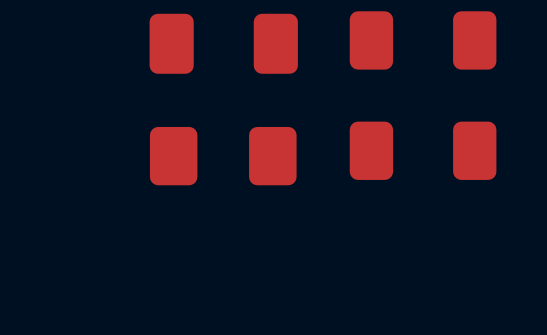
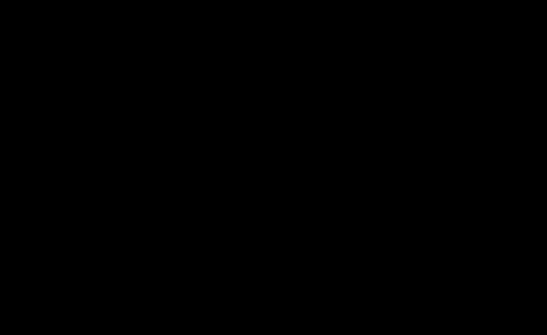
part: (423, 40) -> none
part: (223, 43) -> none
part: (423, 150) -> none
part: (223, 156) -> none

